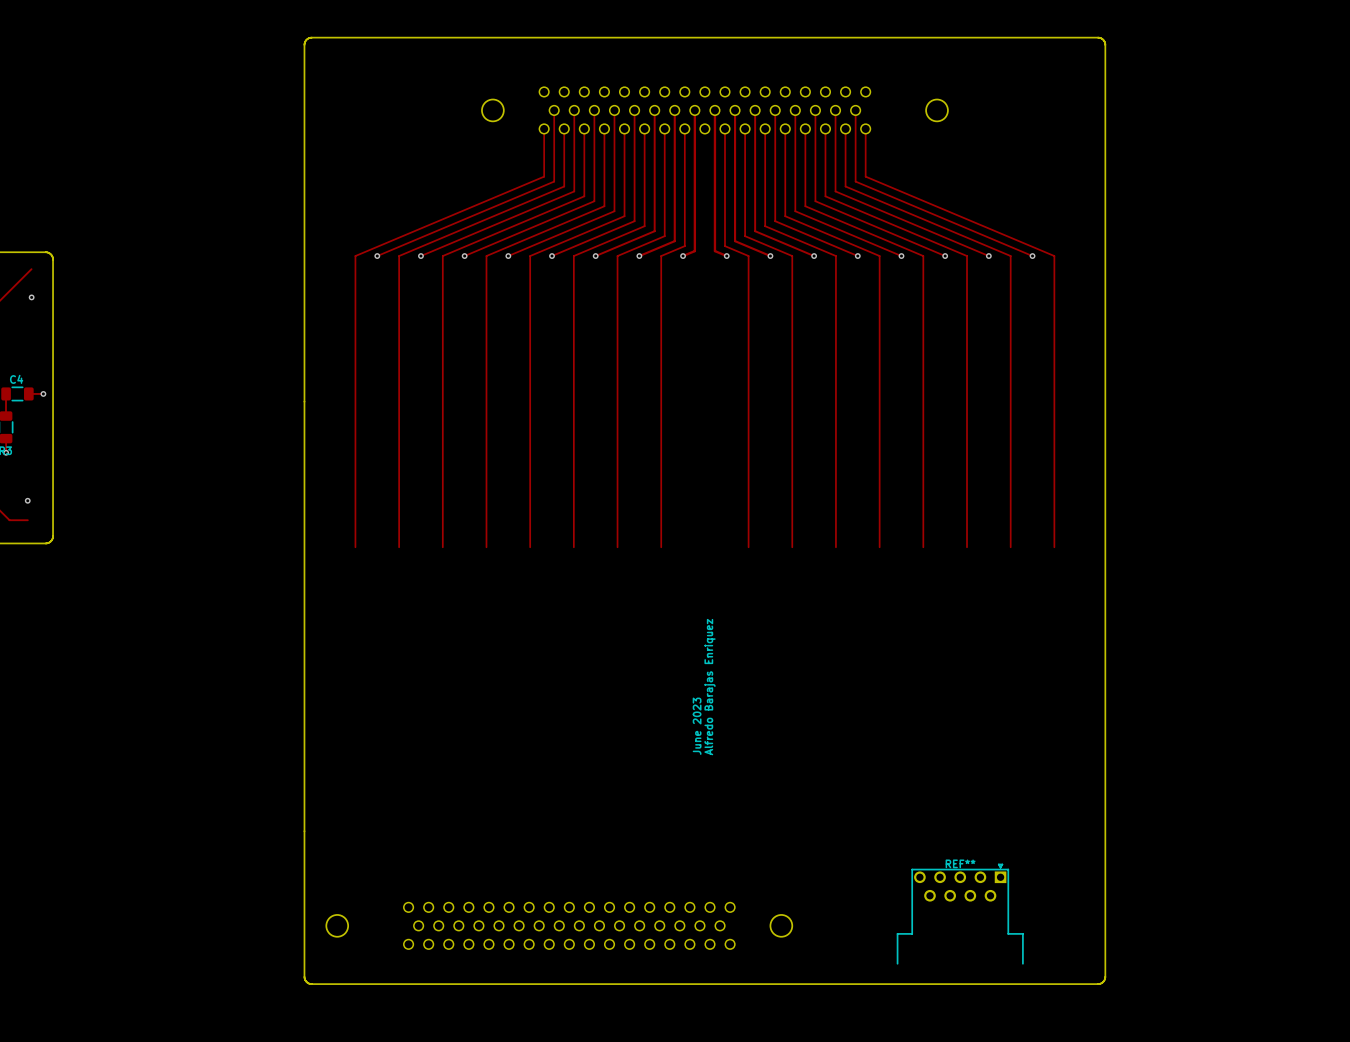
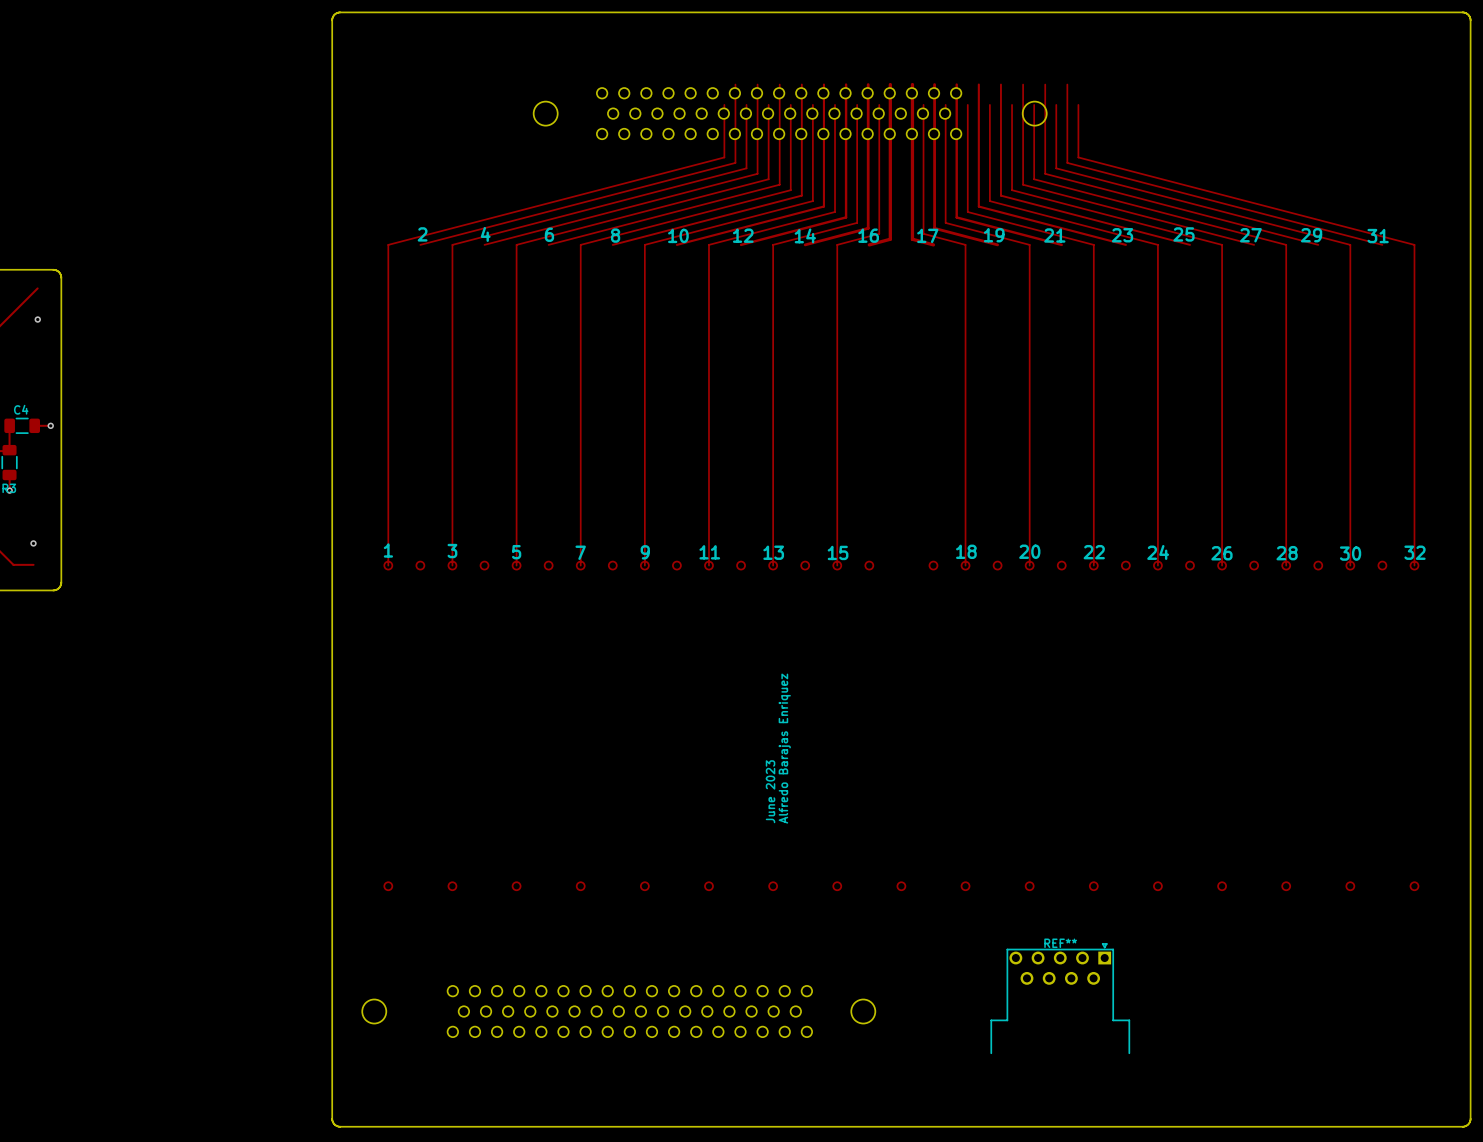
board edge: (311, 37) (306, 39) (304, 44) (304, 976) (306, 981) (311, 984) (1098, 984) (1102, 982) (1105, 976) (1105, 44) (1103, 40) (1098, 37) (311, 37) -> (340, 12) (334, 14) (332, 20) (332, 1118) (334, 1124) (340, 1126) (1462, 1126) (1468, 1124) (1470, 1118) (1470, 20) (1468, 14) (1462, 12) (340, 12)
track: none -> (735, 84) (735, 162) (420, 244)
track: none -> (757, 84) (757, 173) (484, 244)
track: none -> (779, 84) (779, 184) (548, 244)
track: none -> (801, 84) (801, 195) (612, 244)
track: none -> (823, 84) (823, 206) (676, 244)
track: none -> (846, 84) (846, 217) (741, 244)
track: none -> (868, 84) (868, 228) (805, 244)
track: none -> (890, 84) (890, 239) (869, 244)
track: none -> (912, 84) (912, 239) (933, 244)
track: none -> (934, 84) (934, 228) (997, 244)
track: none -> (956, 84) (956, 217) (1061, 244)
track: none -> (978, 84) (978, 206) (1125, 244)
track: none -> (1000, 84) (1000, 195) (1190, 244)
track: none -> (1023, 84) (1023, 184) (1254, 244)
track: none -> (1045, 84) (1045, 173) (1318, 244)
track: none -> (1067, 84) (1067, 162) (1382, 244)
track: none -> (724, 104) (724, 157) (388, 244) (388, 565)
track: none -> (746, 104) (746, 168) (452, 244) (452, 565)
track: none -> (768, 104) (768, 179) (516, 244) (516, 565)
track: none -> (790, 104) (790, 190) (580, 244) (580, 565)
track: none -> (812, 104) (812, 201) (644, 244) (644, 565)
track: none -> (835, 104) (835, 211) (708, 244) (708, 565)
track: none -> (857, 104) (857, 222) (773, 244) (773, 565)
track: none -> (879, 104) (879, 233) (837, 244) (837, 565)
track: none -> (923, 104) (923, 233) (965, 244) (965, 565)
track: none -> (945, 104) (945, 222) (1029, 244) (1029, 565)
track: none -> (967, 104) (967, 212) (1093, 244) (1093, 565)
track: none -> (989, 104) (989, 201) (1157, 244) (1157, 565)
track: none -> (1012, 104) (1012, 190) (1222, 244) (1222, 565)
track: none -> (1034, 104) (1034, 179) (1286, 244) (1286, 565)
track: none -> (1056, 104) (1056, 168) (1350, 244) (1350, 565)
track: none -> (1078, 104) (1078, 157) (1414, 244) (1414, 565)
track: (554, 110) (554, 181) (377, 256) -> none
track: (574, 110) (574, 191) (420, 256) -> none
track: (594, 110) (594, 201) (464, 256) -> none
track: (614, 110) (614, 211) (508, 256) -> none
track: (634, 110) (634, 221) (552, 256) -> none
track: (654, 110) (654, 231) (595, 256) -> none
track: (674, 110) (674, 241) (639, 256) -> none
track: (694, 110) (694, 251) (683, 256) -> none
track: (714, 110) (714, 251) (726, 256) -> none
track: (735, 110) (735, 241) (770, 256) -> none
track: (755, 110) (755, 231) (814, 256) -> none
track: (775, 110) (775, 221) (857, 256) -> none
track: (795, 110) (795, 211) (901, 256) -> none
track: (815, 110) (815, 201) (945, 256) -> none
track: (835, 110) (835, 191) (988, 256) -> none
track: (855, 110) (855, 181) (1032, 256) -> none
track: (544, 128) (544, 176) (355, 256) (355, 547) -> none
track: (564, 128) (564, 186) (399, 256) (399, 547) -> none
track: (584, 128) (584, 196) (442, 256) (442, 547) -> none
track: (604, 128) (604, 206) (486, 256) (486, 547) -> none
track: (624, 128) (624, 216) (530, 256) (530, 547) -> none
track: (644, 128) (644, 226) (573, 256) (573, 547) -> none
track: (664, 128) (664, 236) (617, 256) (617, 547) -> none
track: (684, 128) (684, 246) (661, 256) (661, 547) -> none
track: (725, 128) (725, 246) (748, 256) (748, 547) -> none
track: (745, 128) (745, 236) (792, 256) (792, 547) -> none
track: (765, 128) (765, 226) (835, 256) (835, 547) -> none
track: (785, 128) (785, 216) (879, 256) (879, 547) -> none
track: (805, 128) (805, 206) (923, 256) (923, 547) -> none
track: (825, 128) (825, 196) (967, 256) (967, 547) -> none
track: (845, 128) (845, 186) (1010, 256) (1010, 547) -> none
track: (865, 128) (865, 176) (1054, 256) (1054, 547) -> none
text: none -> 2 (422, 234)
text: none -> 4 (485, 234)
text: none -> 6 (549, 234)
text: none -> 19 (994, 235)
text: none -> 23 (1122, 235)
text: none -> 25 (1183, 234)
text: none -> 27 (1250, 235)
text: none -> 29 (1311, 235)
text: none -> 8 (615, 235)
text: none -> 10 (678, 235)
text: none -> 12 (743, 235)
text: none -> 14 (805, 235)
text: none -> 16 (868, 235)
text: none -> 17 (927, 235)
text: none -> 21 (1054, 235)
text: none -> 31 (1378, 236)
via: (377, 256) -> none
via: (420, 256) -> none
via: (464, 256) -> none
via: (508, 256) -> none
via: (552, 256) -> none
via: (595, 256) -> none
via: (639, 256) -> none
via: (683, 256) -> none
via: (726, 256) -> none
via: (770, 256) -> none
via: (814, 256) -> none
via: (857, 256) -> none
via: (901, 256) -> none
via: (945, 256) -> none
via: (988, 256) -> none
via: (1032, 256) -> none
text: none -> 1 (388, 550)
text: none -> 3 (452, 551)
text: none -> 5 (516, 552)
text: none -> 9 (645, 552)
text: none -> 11 (709, 552)
text: none -> 18 (966, 551)
text: none -> 20 (1029, 551)
text: none -> 22 (1094, 552)
text: none -> 24 (1158, 552)
text: none -> 7 (580, 552)
text: none -> 13 (773, 552)
text: none -> 15 (838, 552)
text: none -> 26 (1221, 553)
text: none -> 28 (1287, 553)
text: none -> 30 (1350, 553)
text: none -> 32 (1415, 552)
drawing: none -> [383, 560, 393, 571]
drawing: none -> [415, 560, 425, 571]
drawing: none -> [447, 560, 458, 571]
drawing: none -> [479, 560, 490, 571]
drawing: none -> [511, 560, 522, 571]
drawing: none -> [544, 560, 554, 571]
drawing: none -> [576, 560, 586, 571]
drawing: none -> [608, 560, 618, 571]
drawing: none -> [640, 560, 650, 571]
drawing: none -> [672, 560, 682, 571]
drawing: none -> [704, 560, 714, 571]
drawing: none -> [736, 560, 746, 571]
drawing: none -> [768, 560, 778, 571]
drawing: none -> [800, 560, 810, 571]
drawing: none -> [832, 560, 842, 571]
drawing: none -> [864, 560, 874, 571]
drawing: none -> [928, 560, 939, 571]
drawing: none -> [960, 560, 971, 571]
drawing: none -> [992, 560, 1003, 571]
drawing: none -> [1025, 560, 1035, 571]
drawing: none -> [1057, 560, 1067, 571]
drawing: none -> [1089, 560, 1099, 571]
drawing: none -> [1121, 560, 1131, 571]
drawing: none -> [1153, 560, 1163, 571]
drawing: none -> [1185, 560, 1195, 571]
drawing: none -> [1217, 560, 1227, 571]
drawing: none -> [1249, 560, 1259, 571]
drawing: none -> [1281, 560, 1291, 571]
drawing: none -> [1313, 560, 1323, 571]
drawing: none -> [1345, 560, 1355, 571]
drawing: none -> [1377, 560, 1388, 571]
drawing: none -> [1409, 560, 1420, 571]
drawing: none -> [383, 881, 393, 891]
drawing: none -> [447, 881, 458, 891]
drawing: none -> [511, 881, 522, 891]
drawing: none -> [576, 881, 586, 891]
drawing: none -> [640, 881, 650, 891]
drawing: none -> [704, 881, 714, 891]
drawing: none -> [768, 881, 778, 891]
drawing: none -> [832, 881, 842, 891]
drawing: none -> [896, 881, 907, 891]
drawing: none -> [960, 881, 971, 891]
drawing: none -> [1025, 881, 1035, 891]
drawing: none -> [1089, 881, 1099, 891]
drawing: none -> [1153, 881, 1163, 891]
drawing: none -> [1217, 881, 1227, 891]
drawing: none -> [1281, 881, 1291, 891]
drawing: none -> [1345, 881, 1355, 891]
drawing: none -> [1409, 881, 1420, 891]

